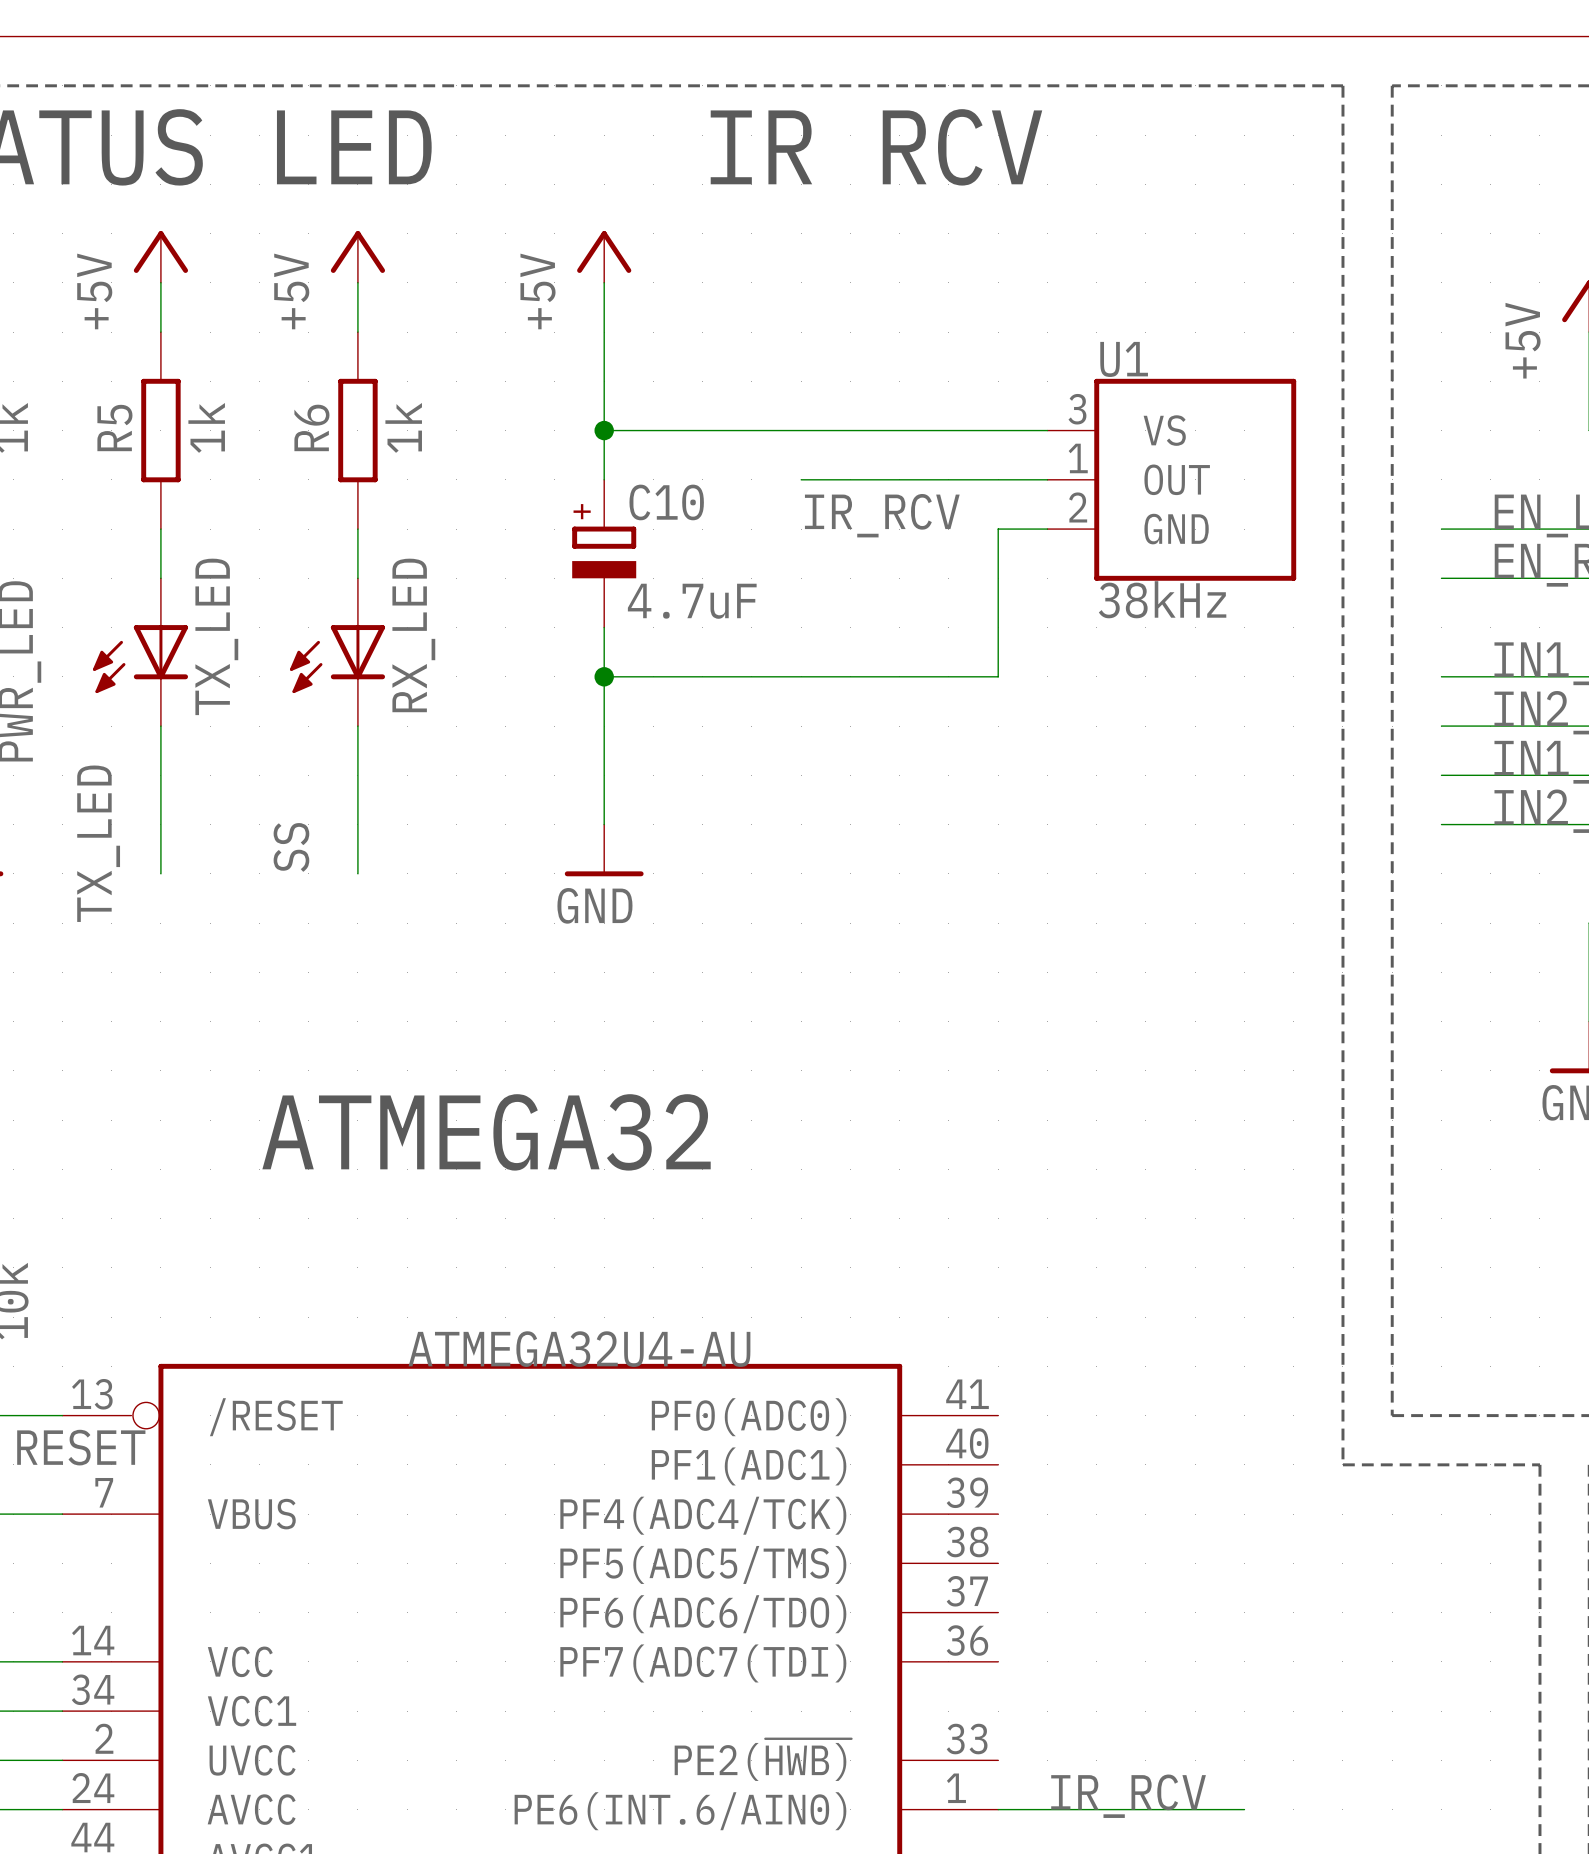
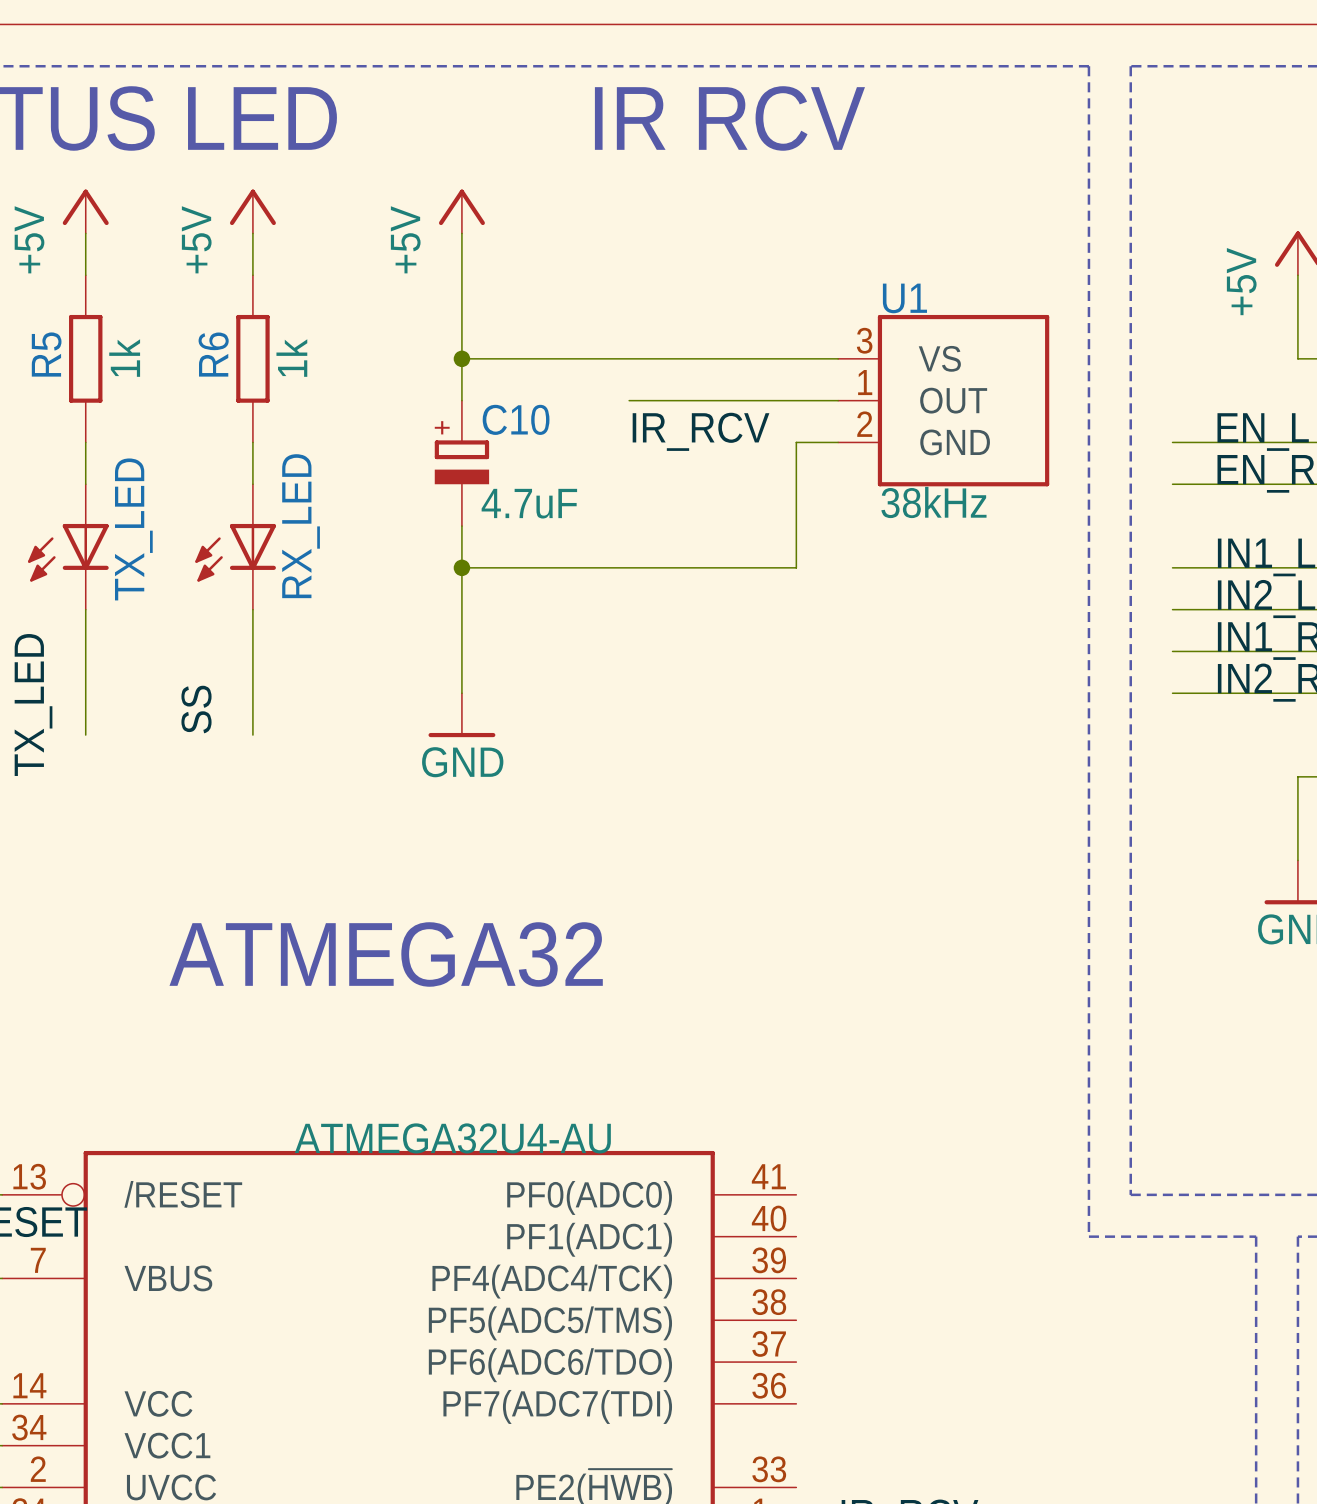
text position: IR RCV (876, 147) -> IR RCV (729, 118)

